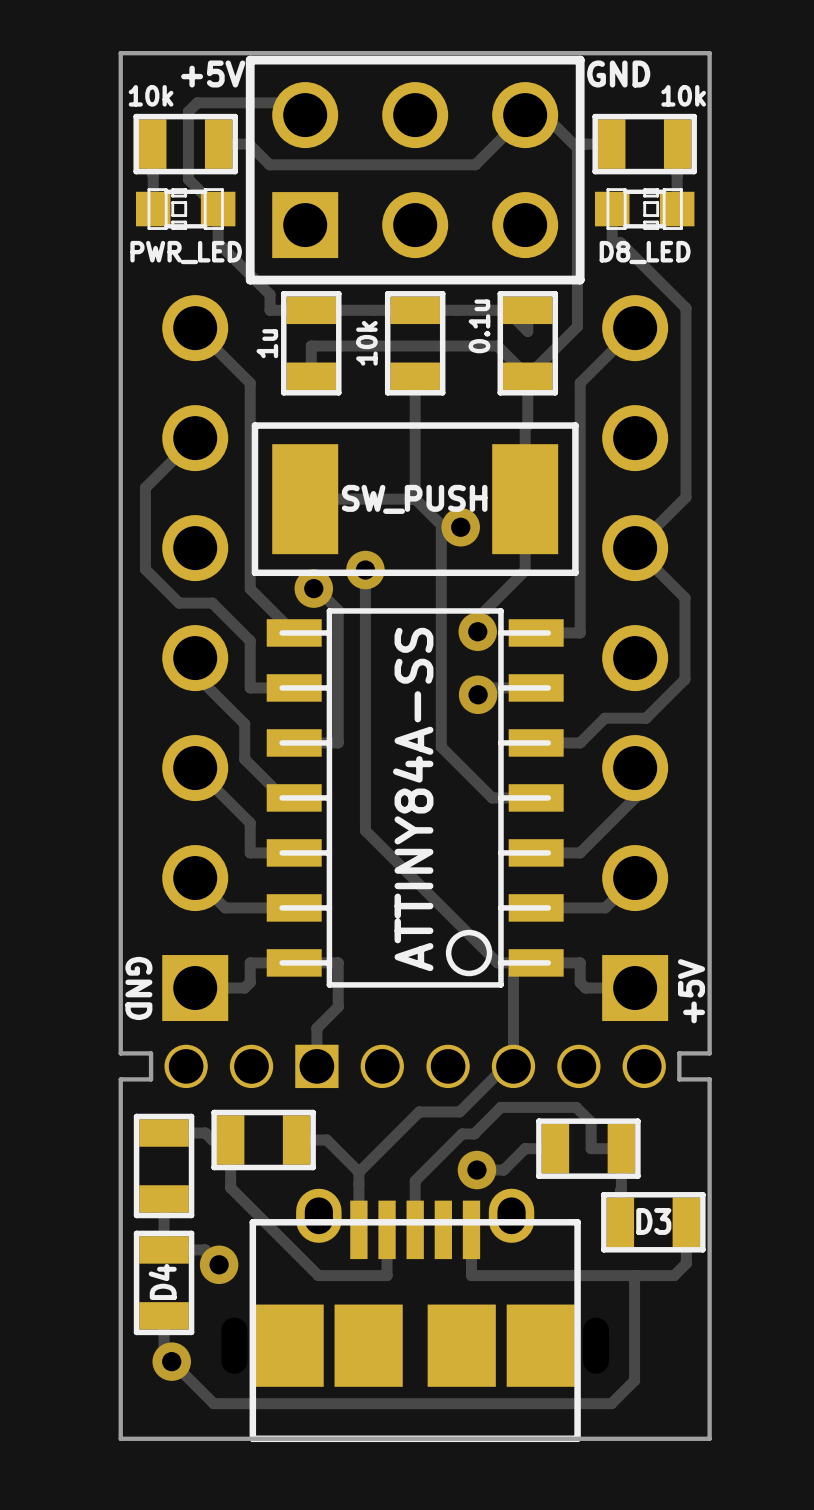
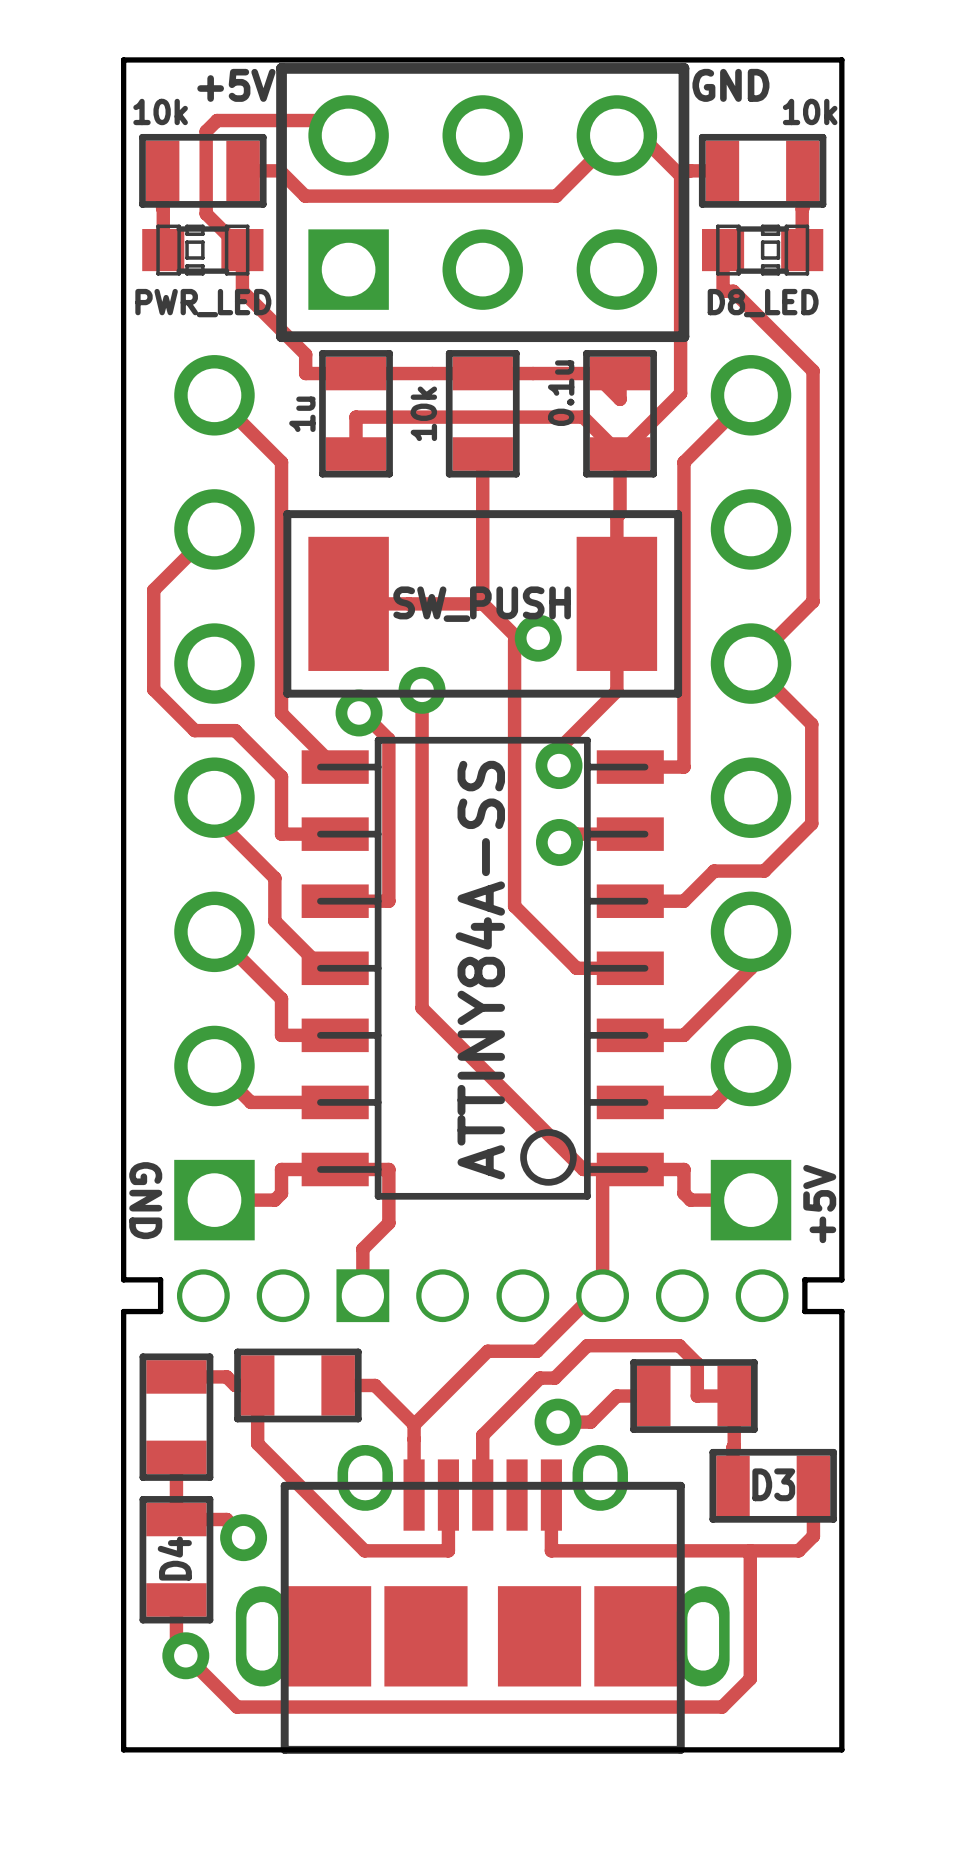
part footprint: [221, 1188, 609, 1443] -> [235, 1444, 730, 1754]

